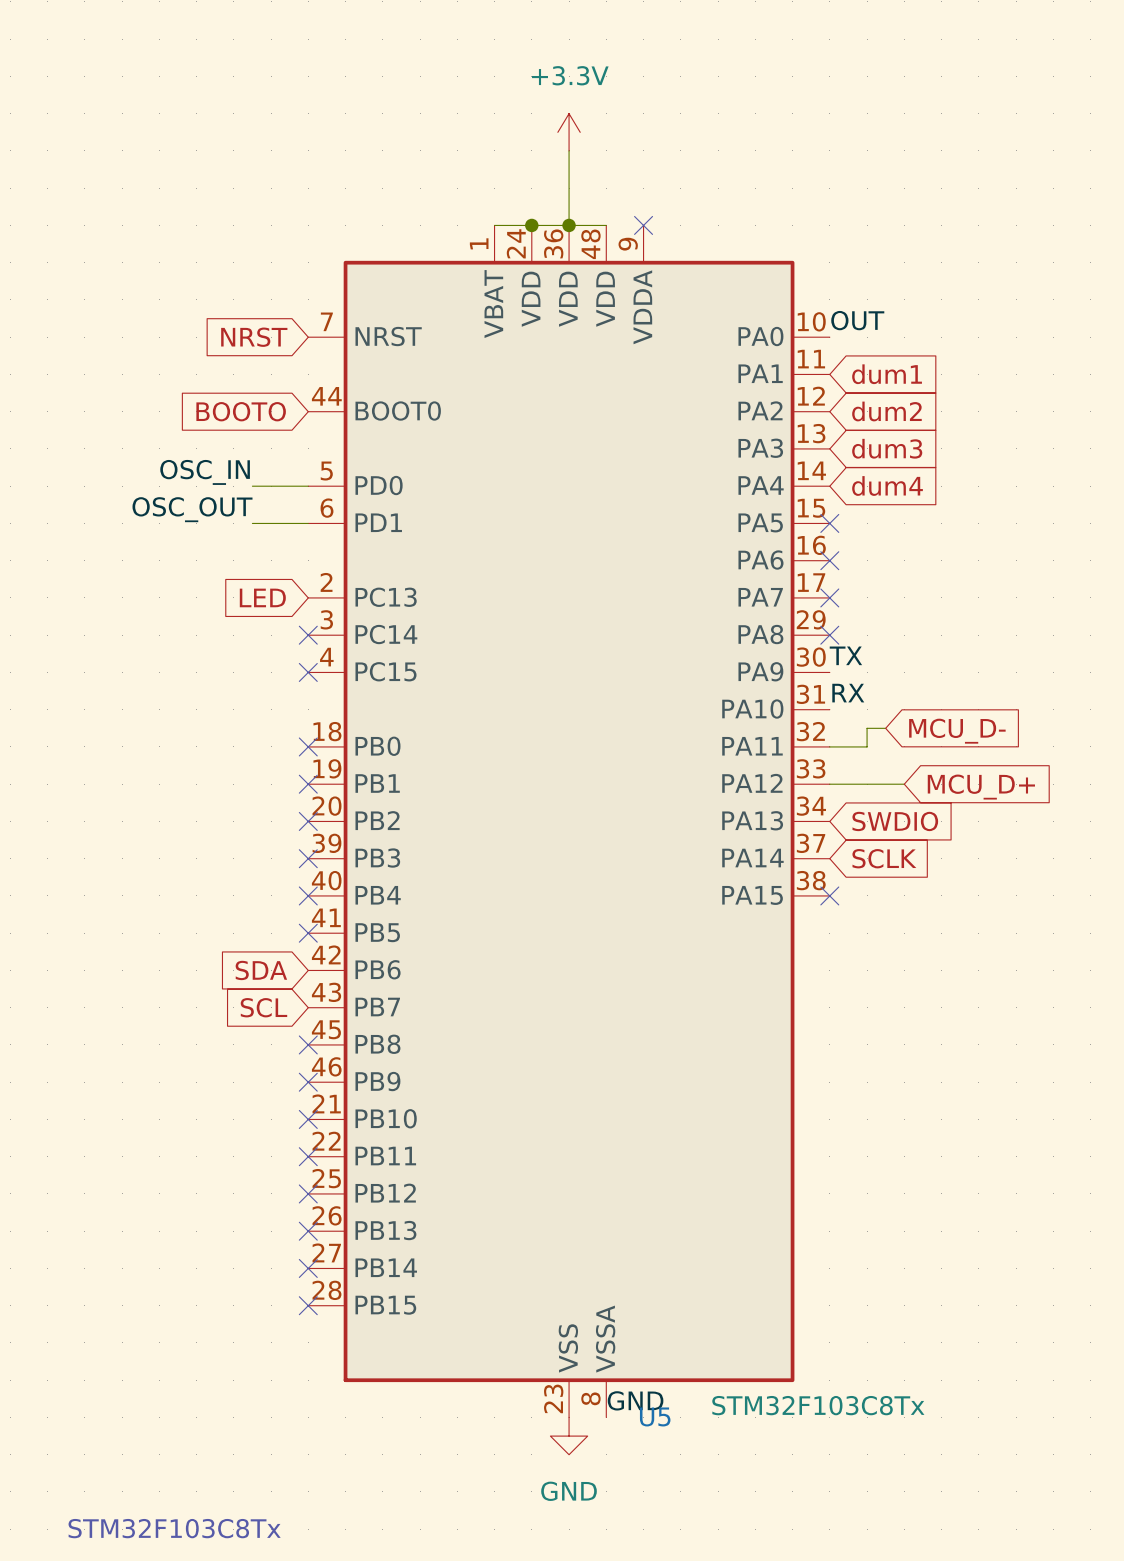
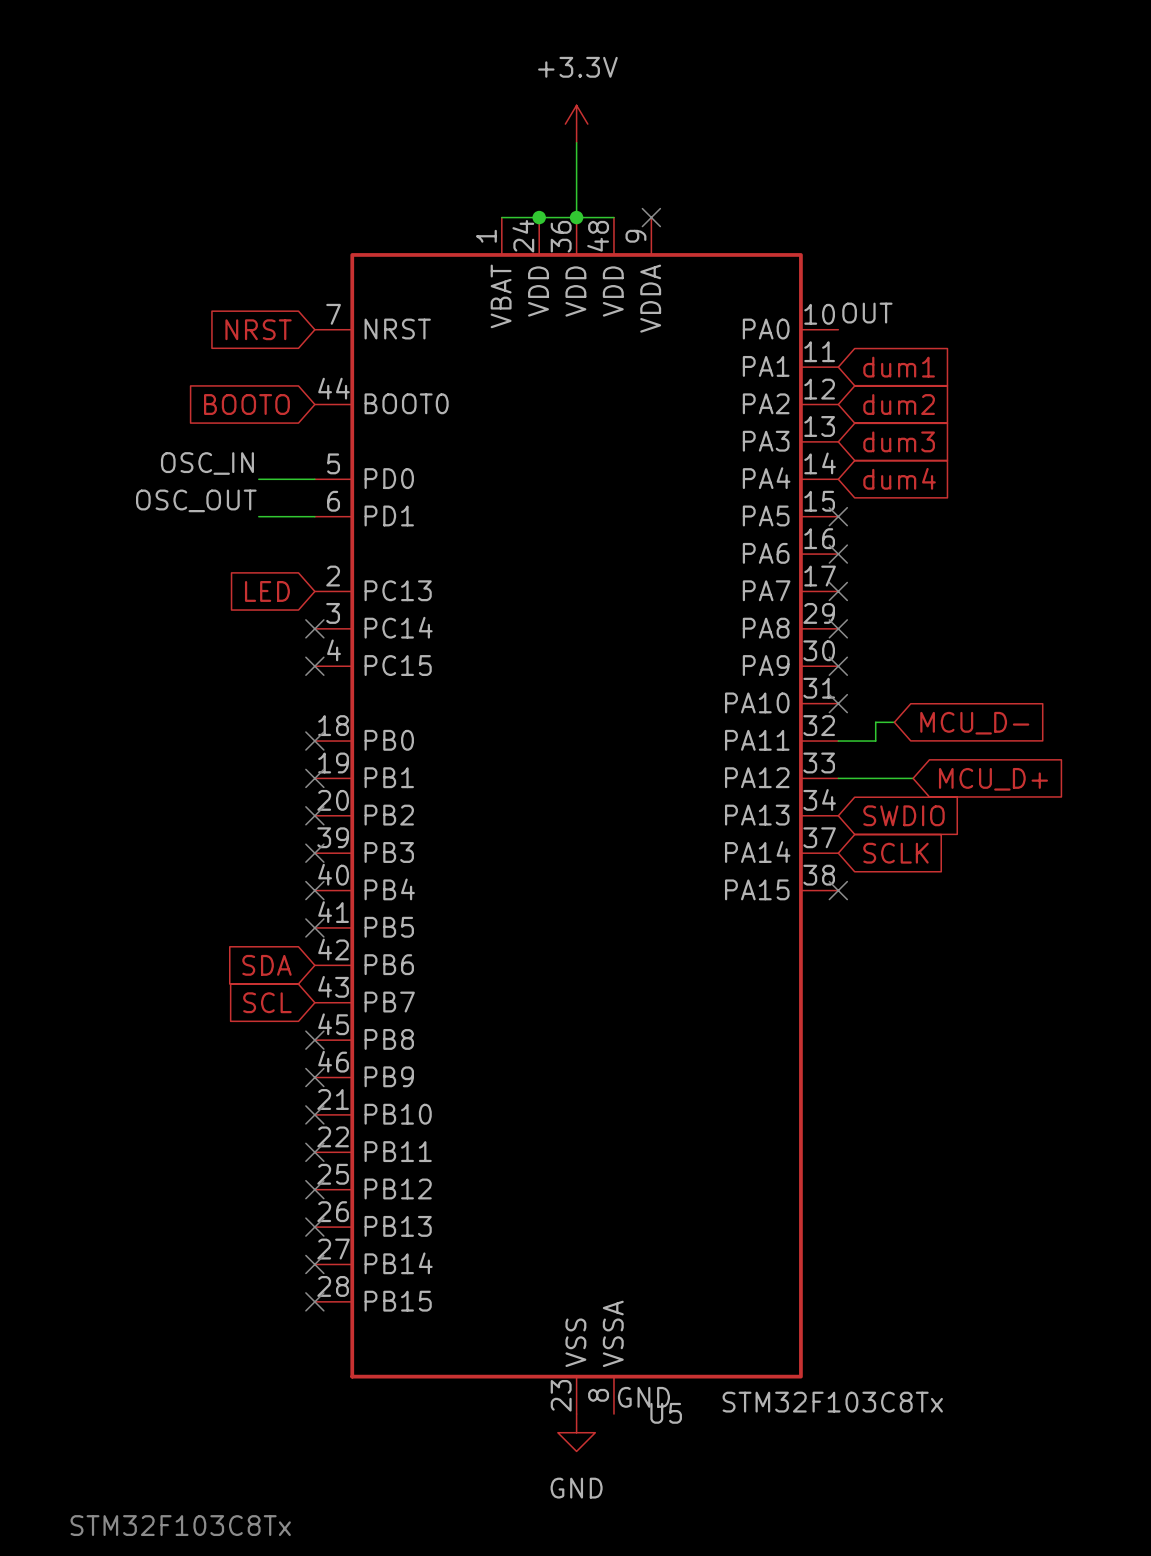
label: TX (845, 655) -> none
no-connect mark: none -> (838, 666)
label: RX (848, 693) -> none
no-connect mark: none -> (838, 703)

